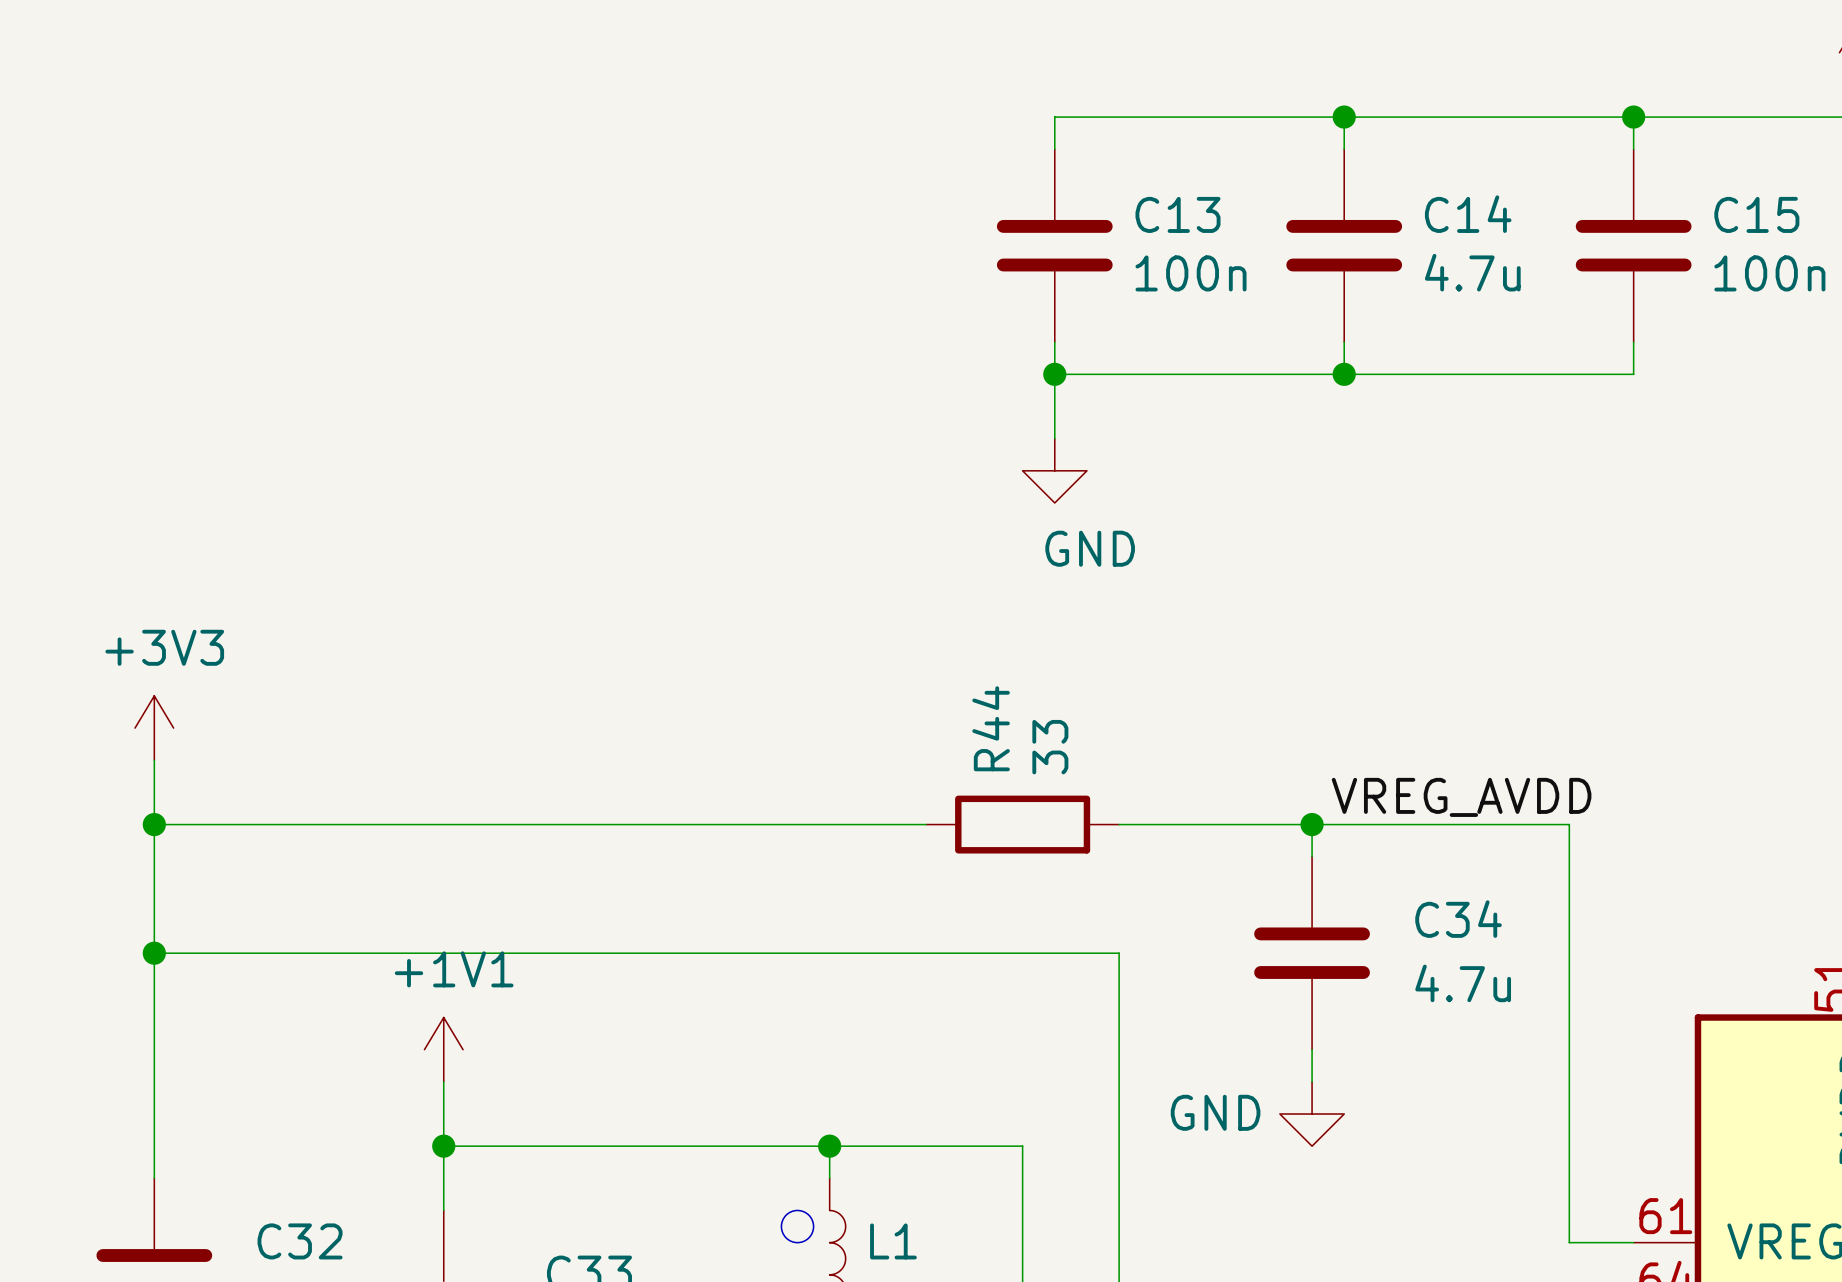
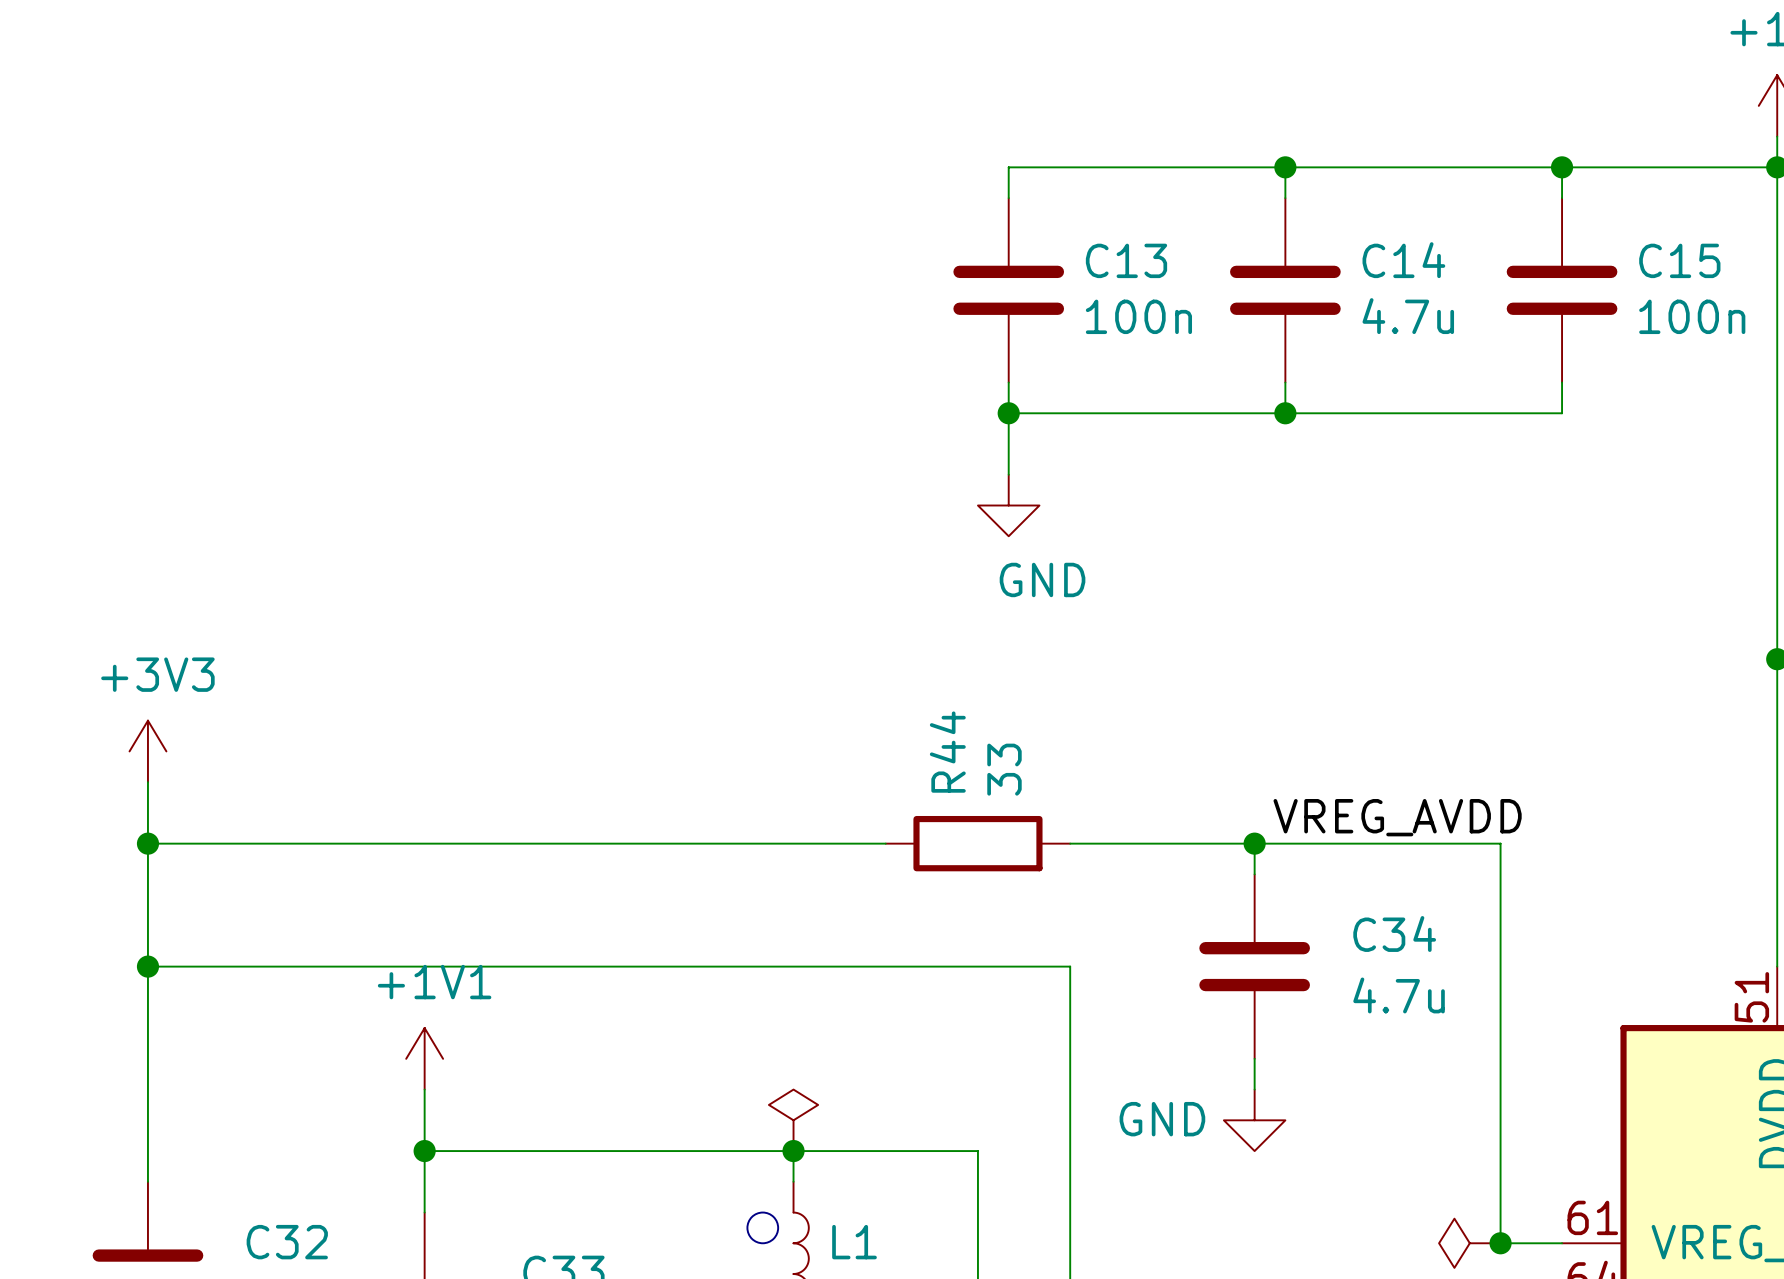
power symbol: none -> (793, 1120)
power symbol: none -> (1469, 1243)
junction: none -> (1500, 1243)

